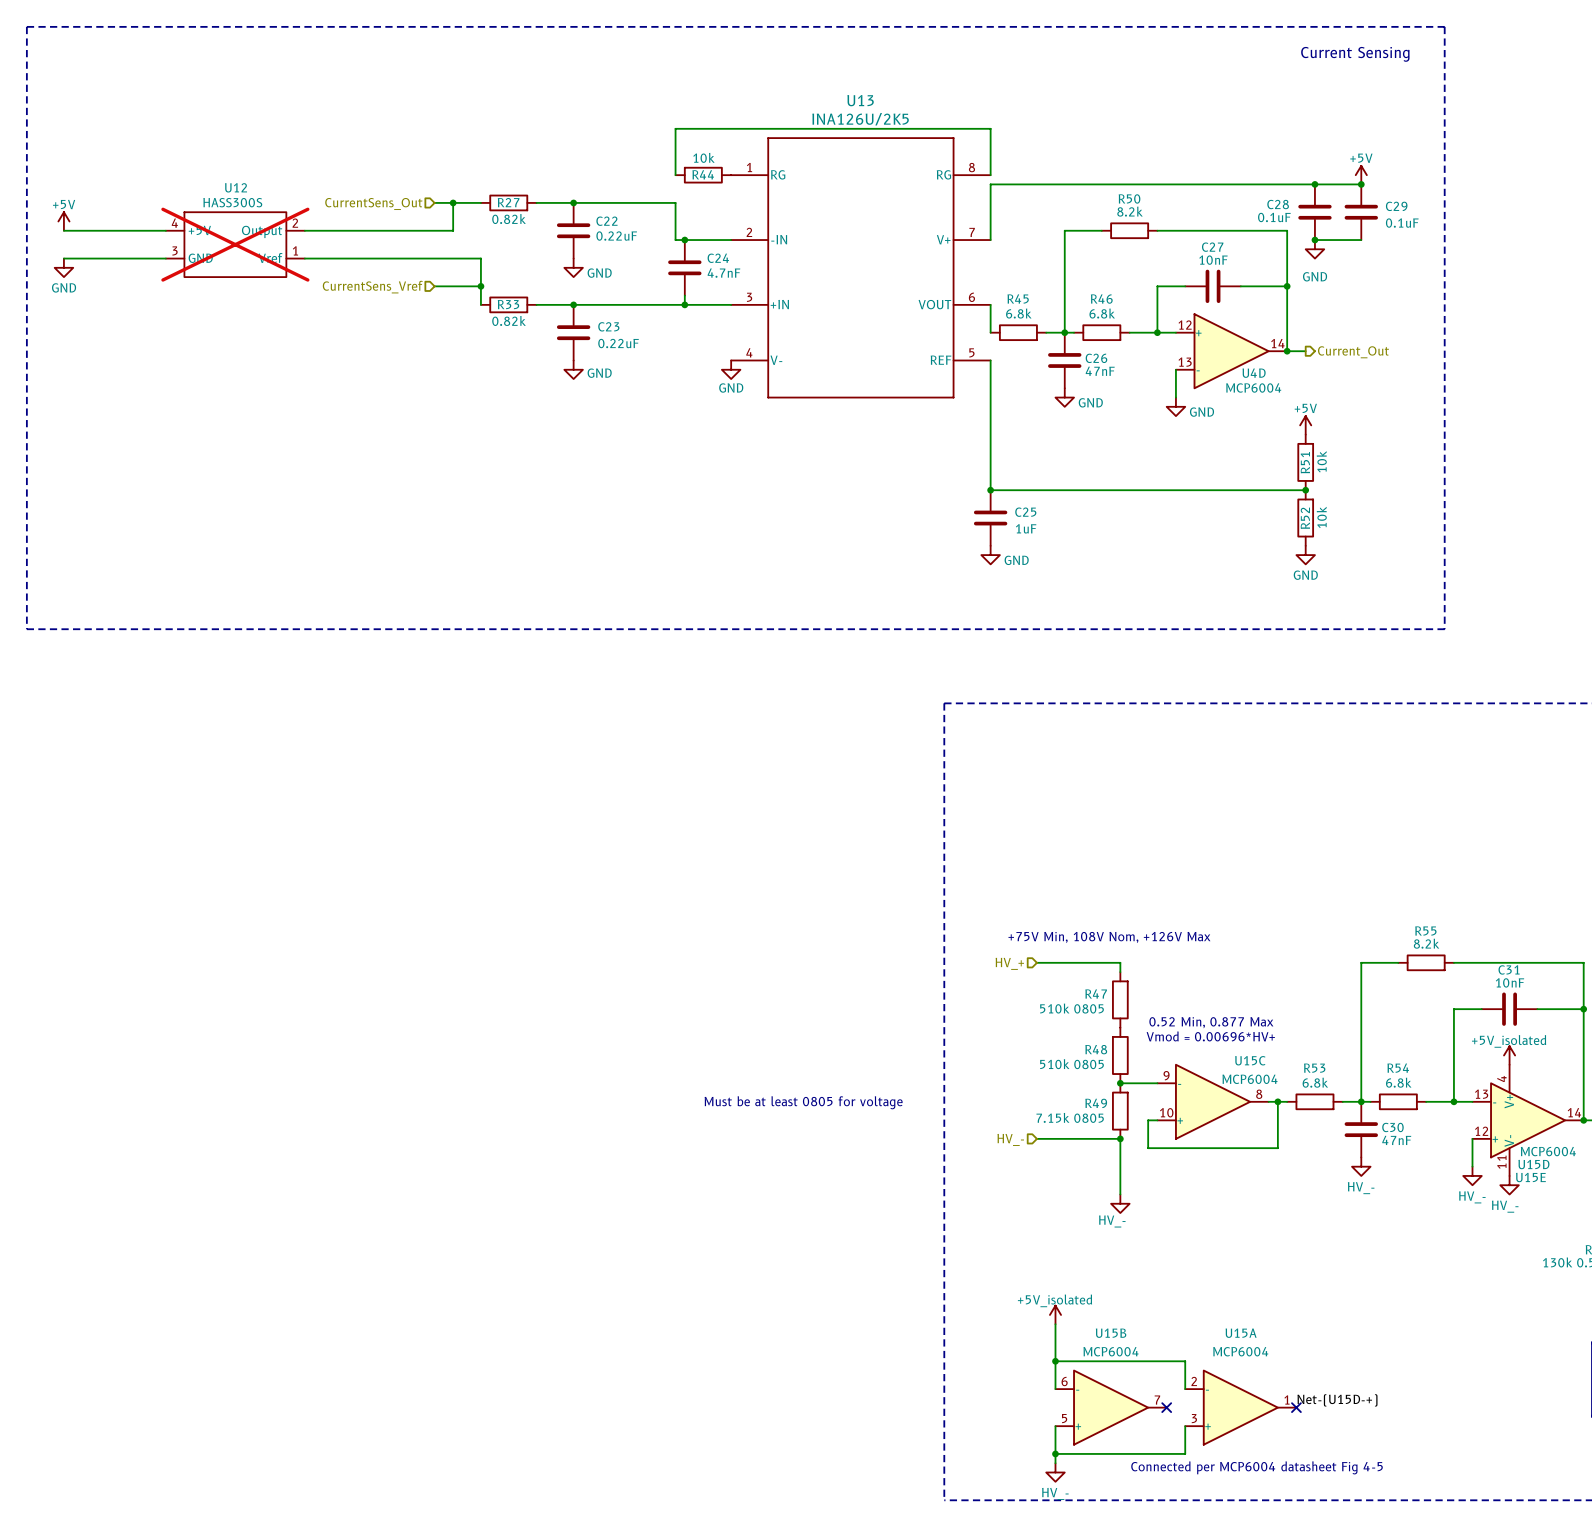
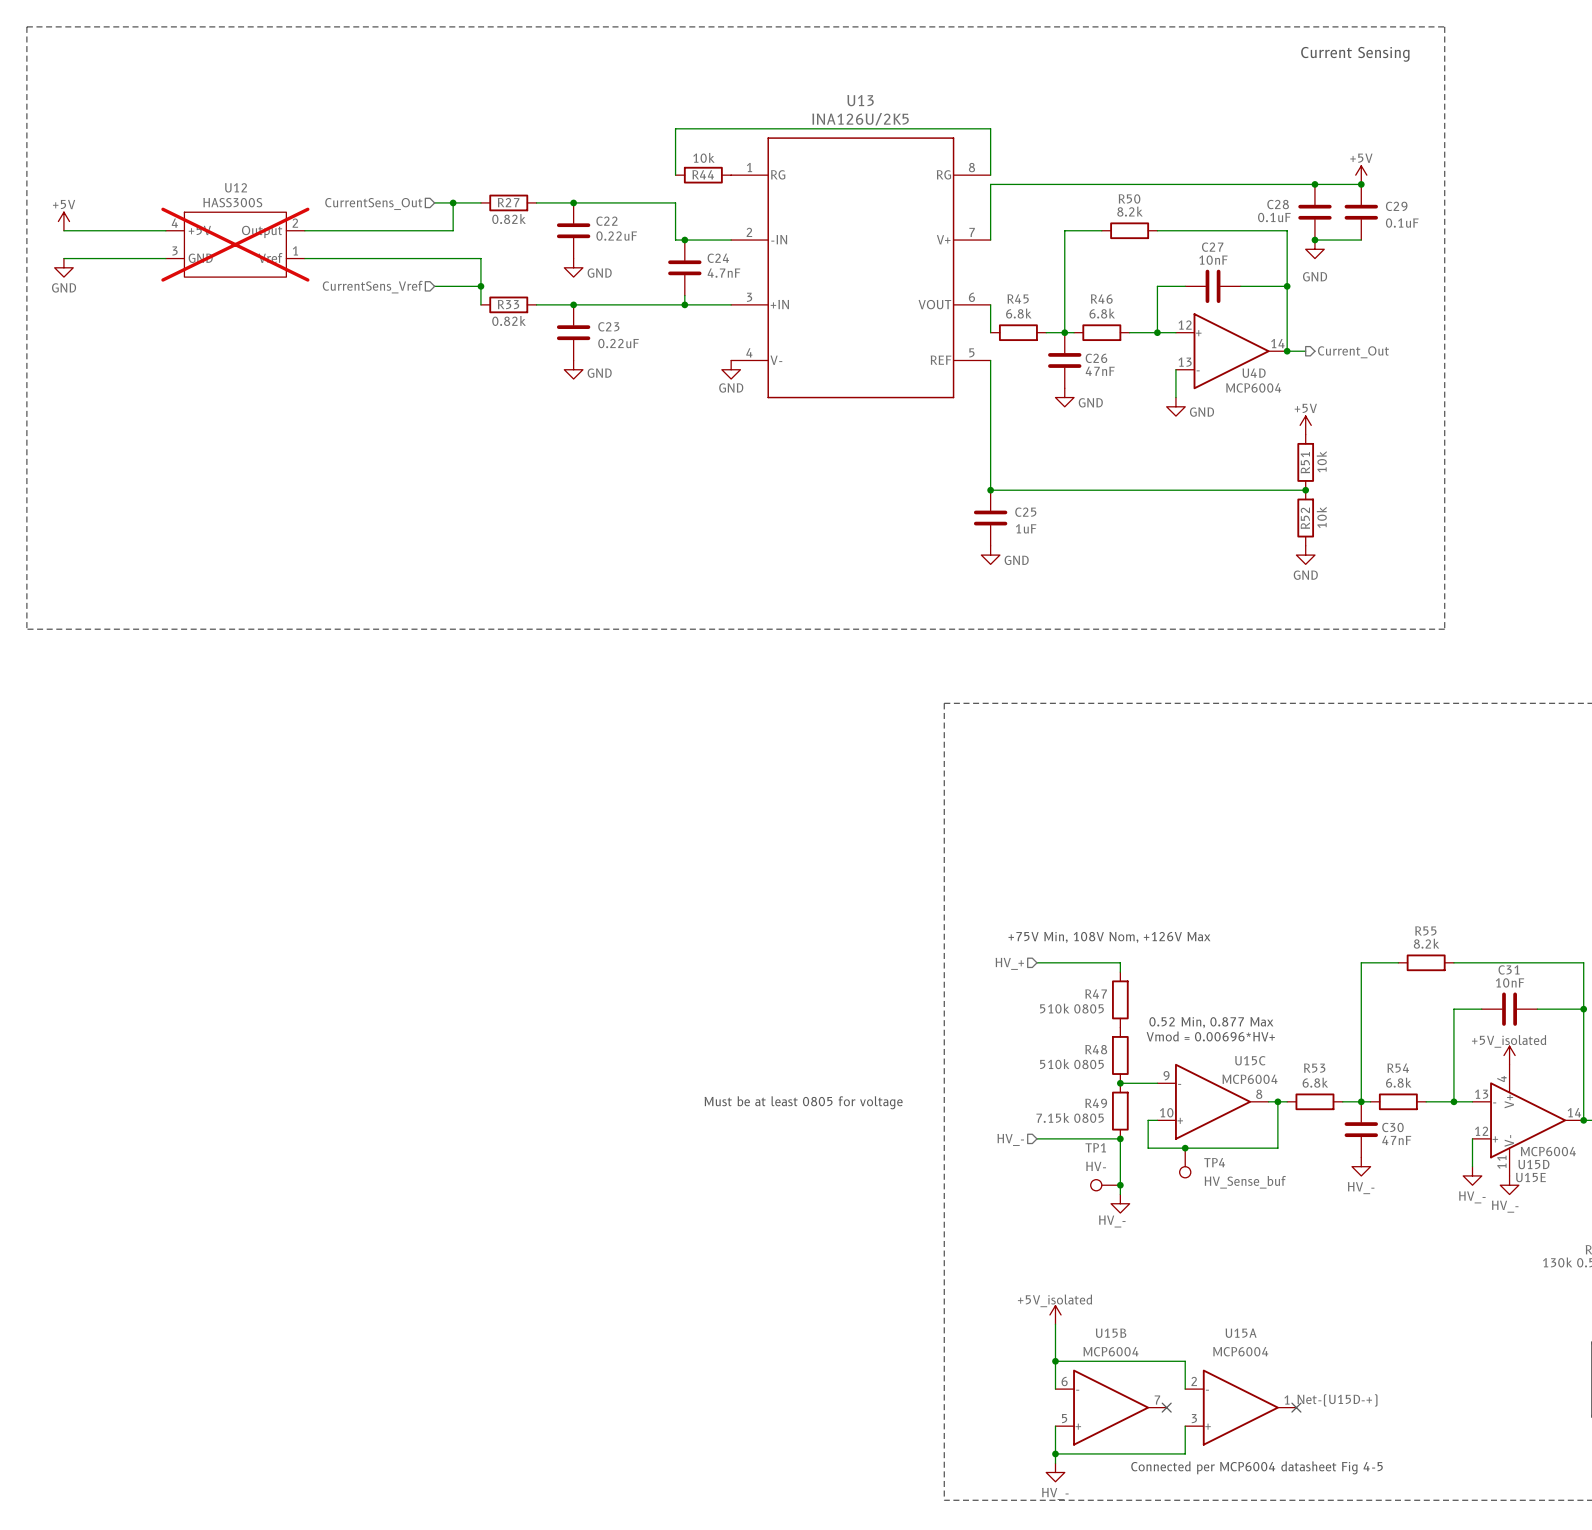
junction: none -> (1185, 1148)
TP4: none -> HV_Sense_buf (1185, 1162)
TP1: none -> HV- (1105, 1185)
junction: none -> (1120, 1185)

